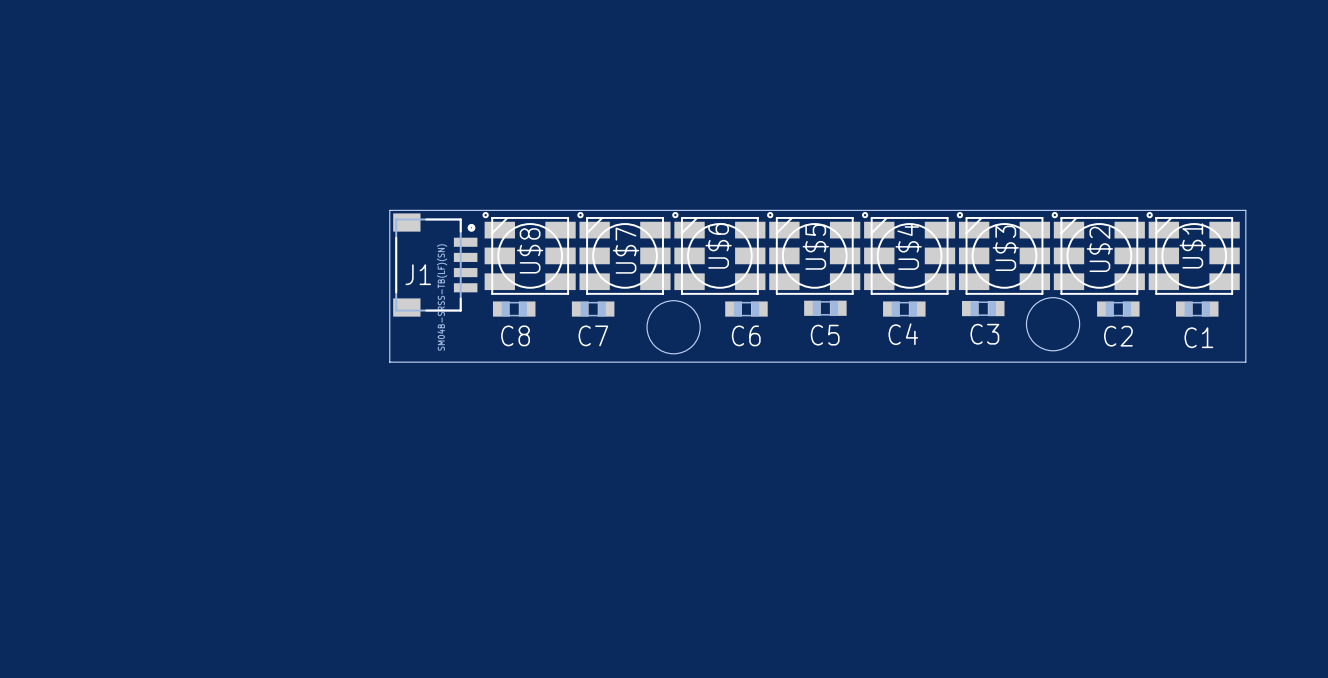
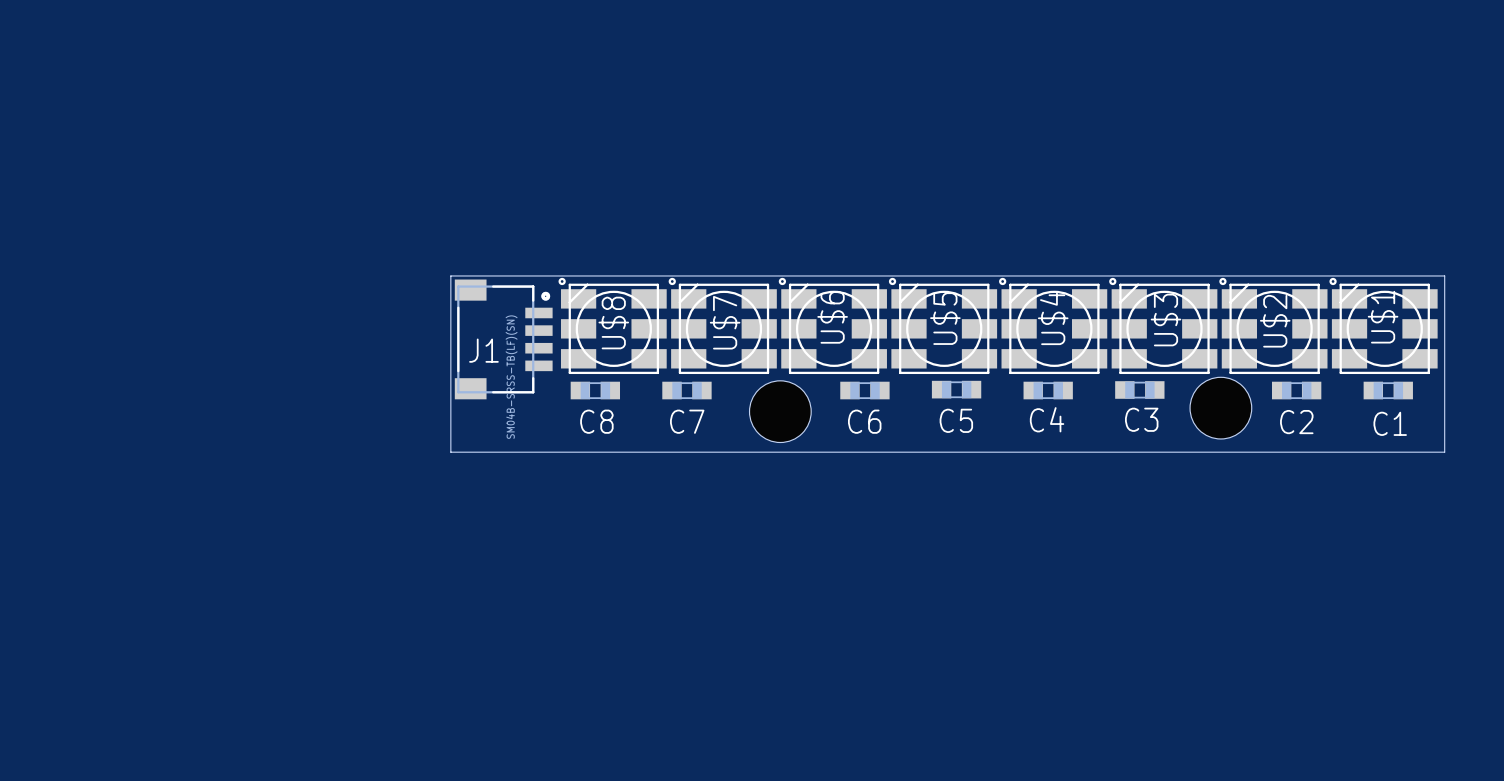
round board edge: [1026, 297, 1080, 351] -> none
round board edge: [647, 300, 701, 354] -> none
hole: none -> (1220, 408)
hole: none -> (780, 411)

